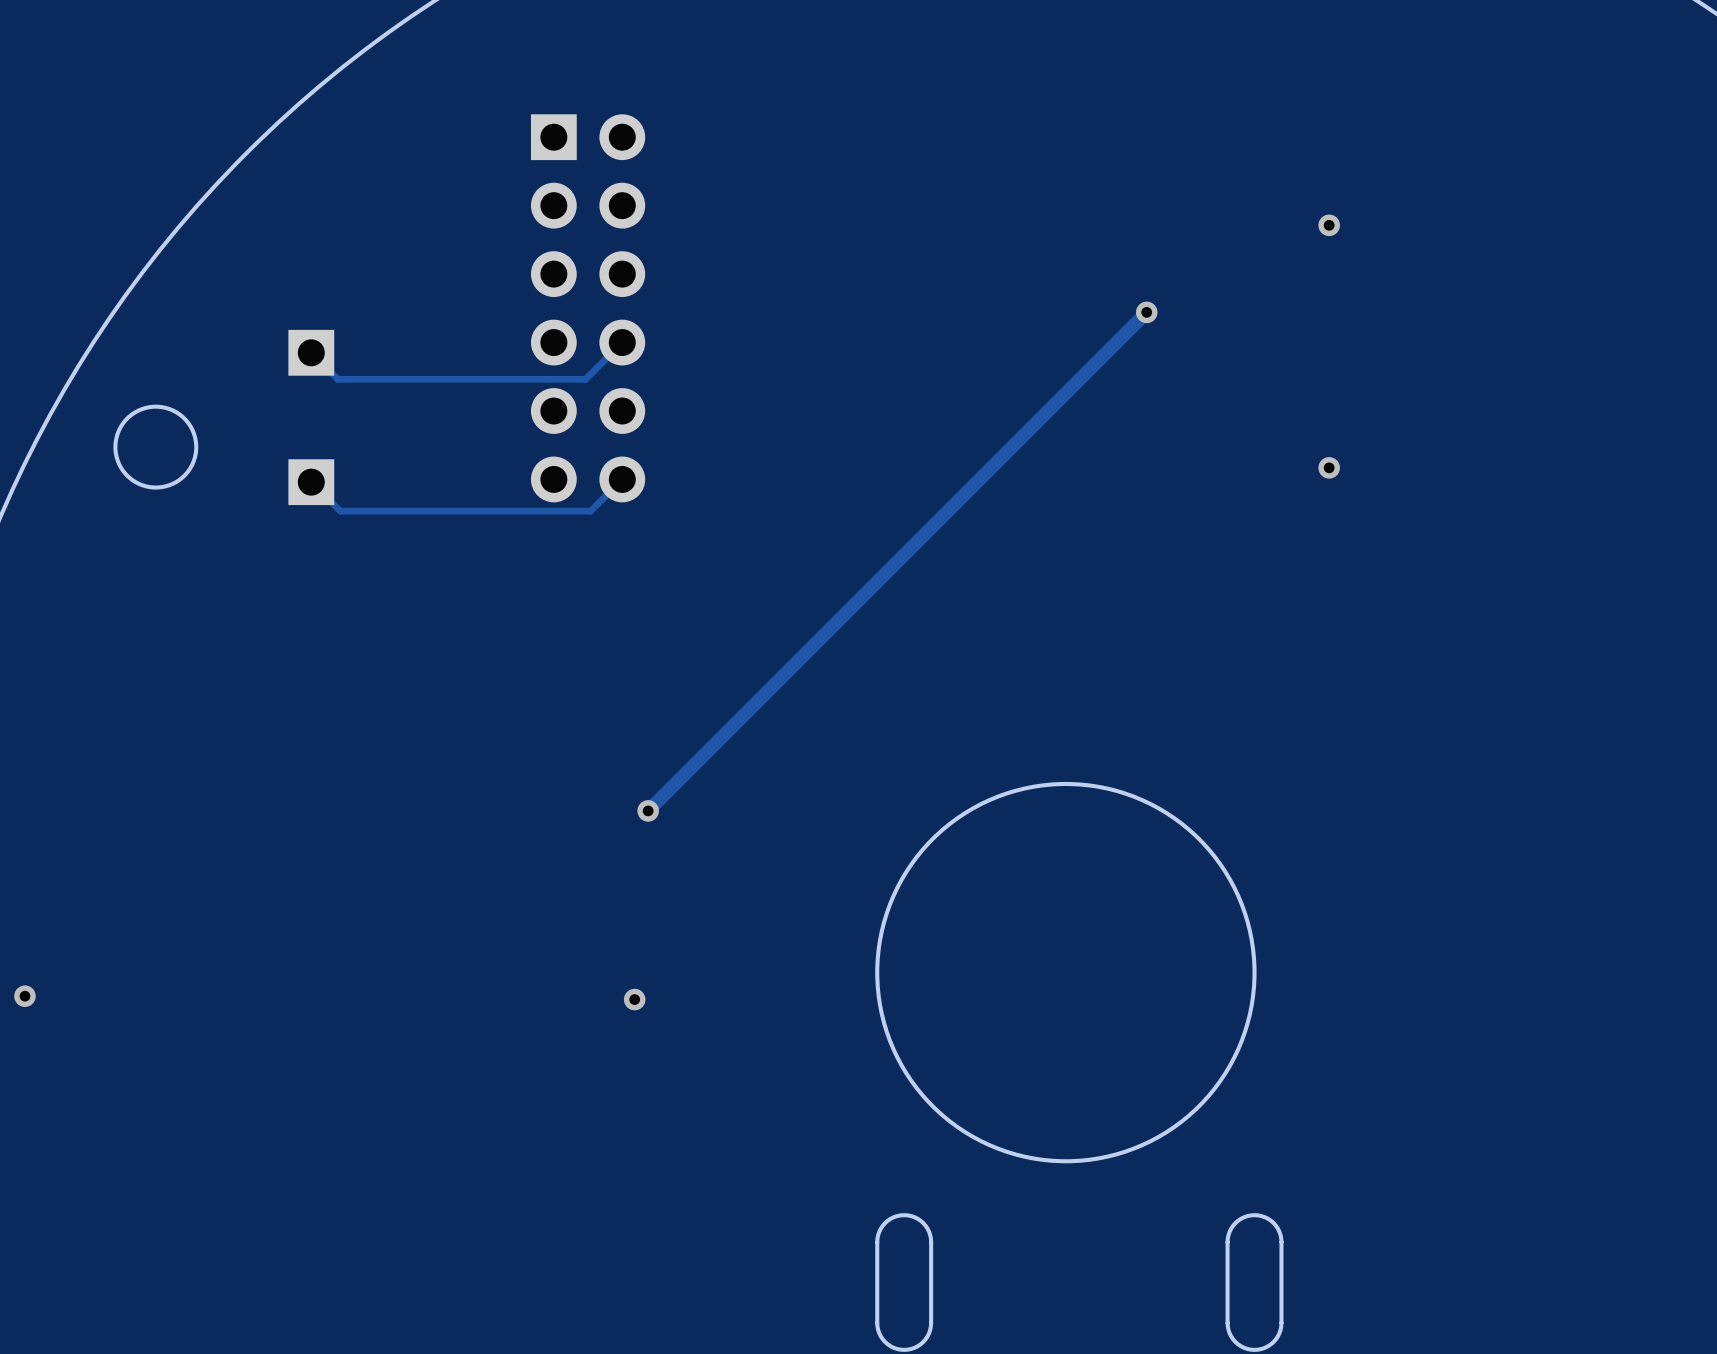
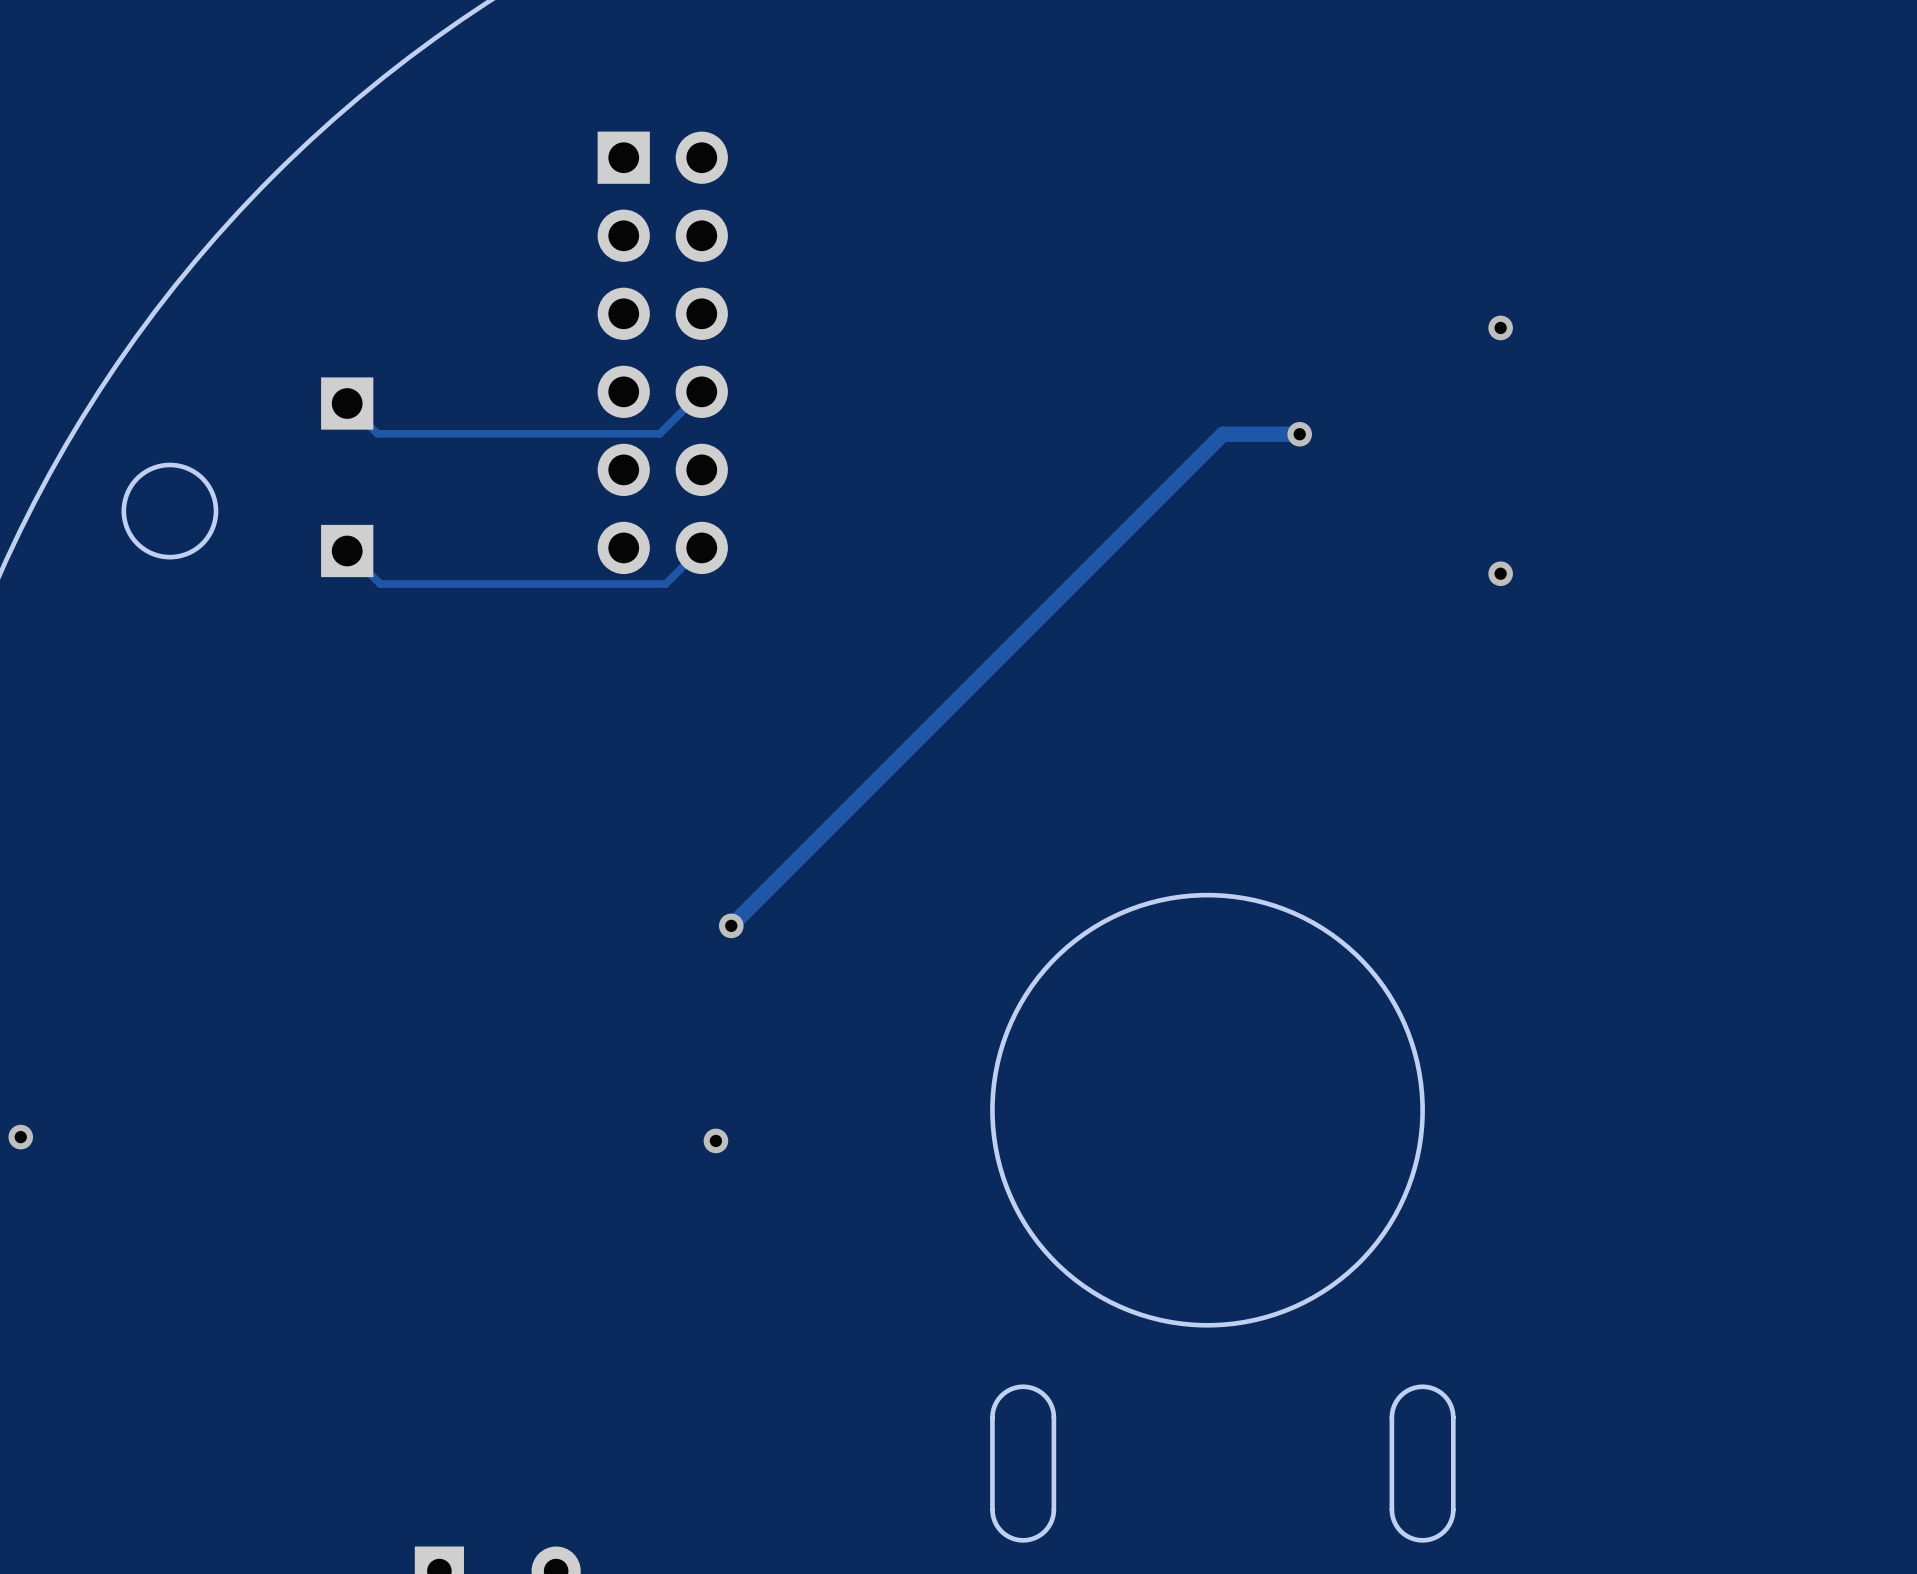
via position: (1329, 225) -> (1500, 327)
track: (1146, 312) (1079, 379) -> (1299, 434) (1222, 434)
via position: (1146, 312) -> (1299, 434)
via position: (1329, 467) -> (1500, 573)

